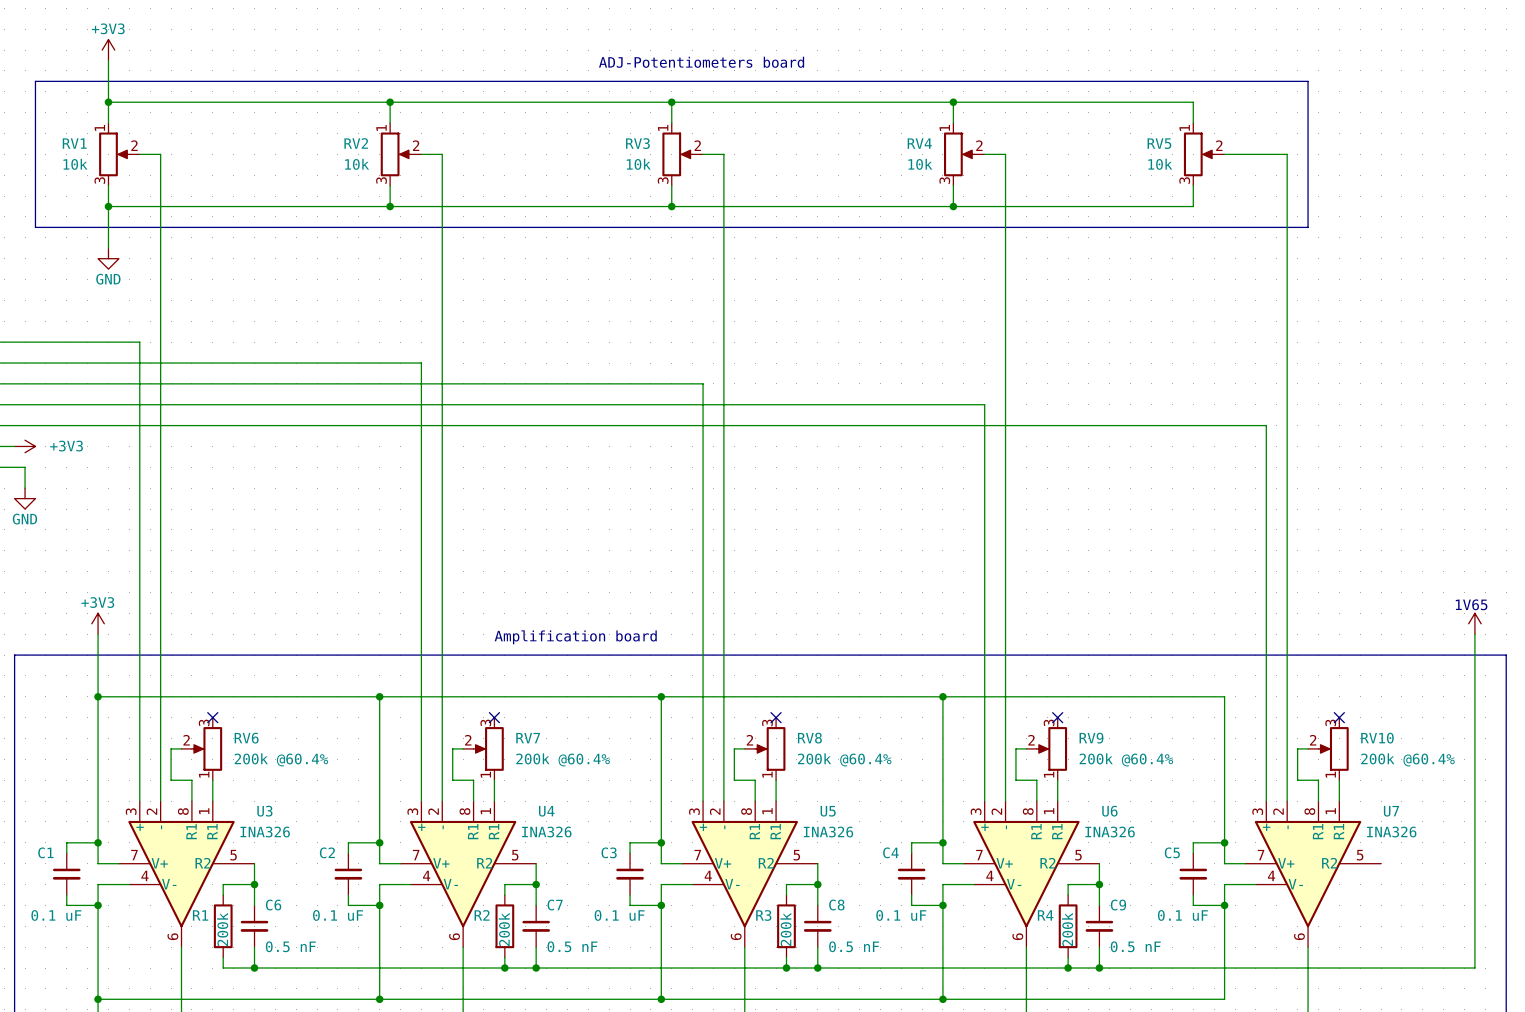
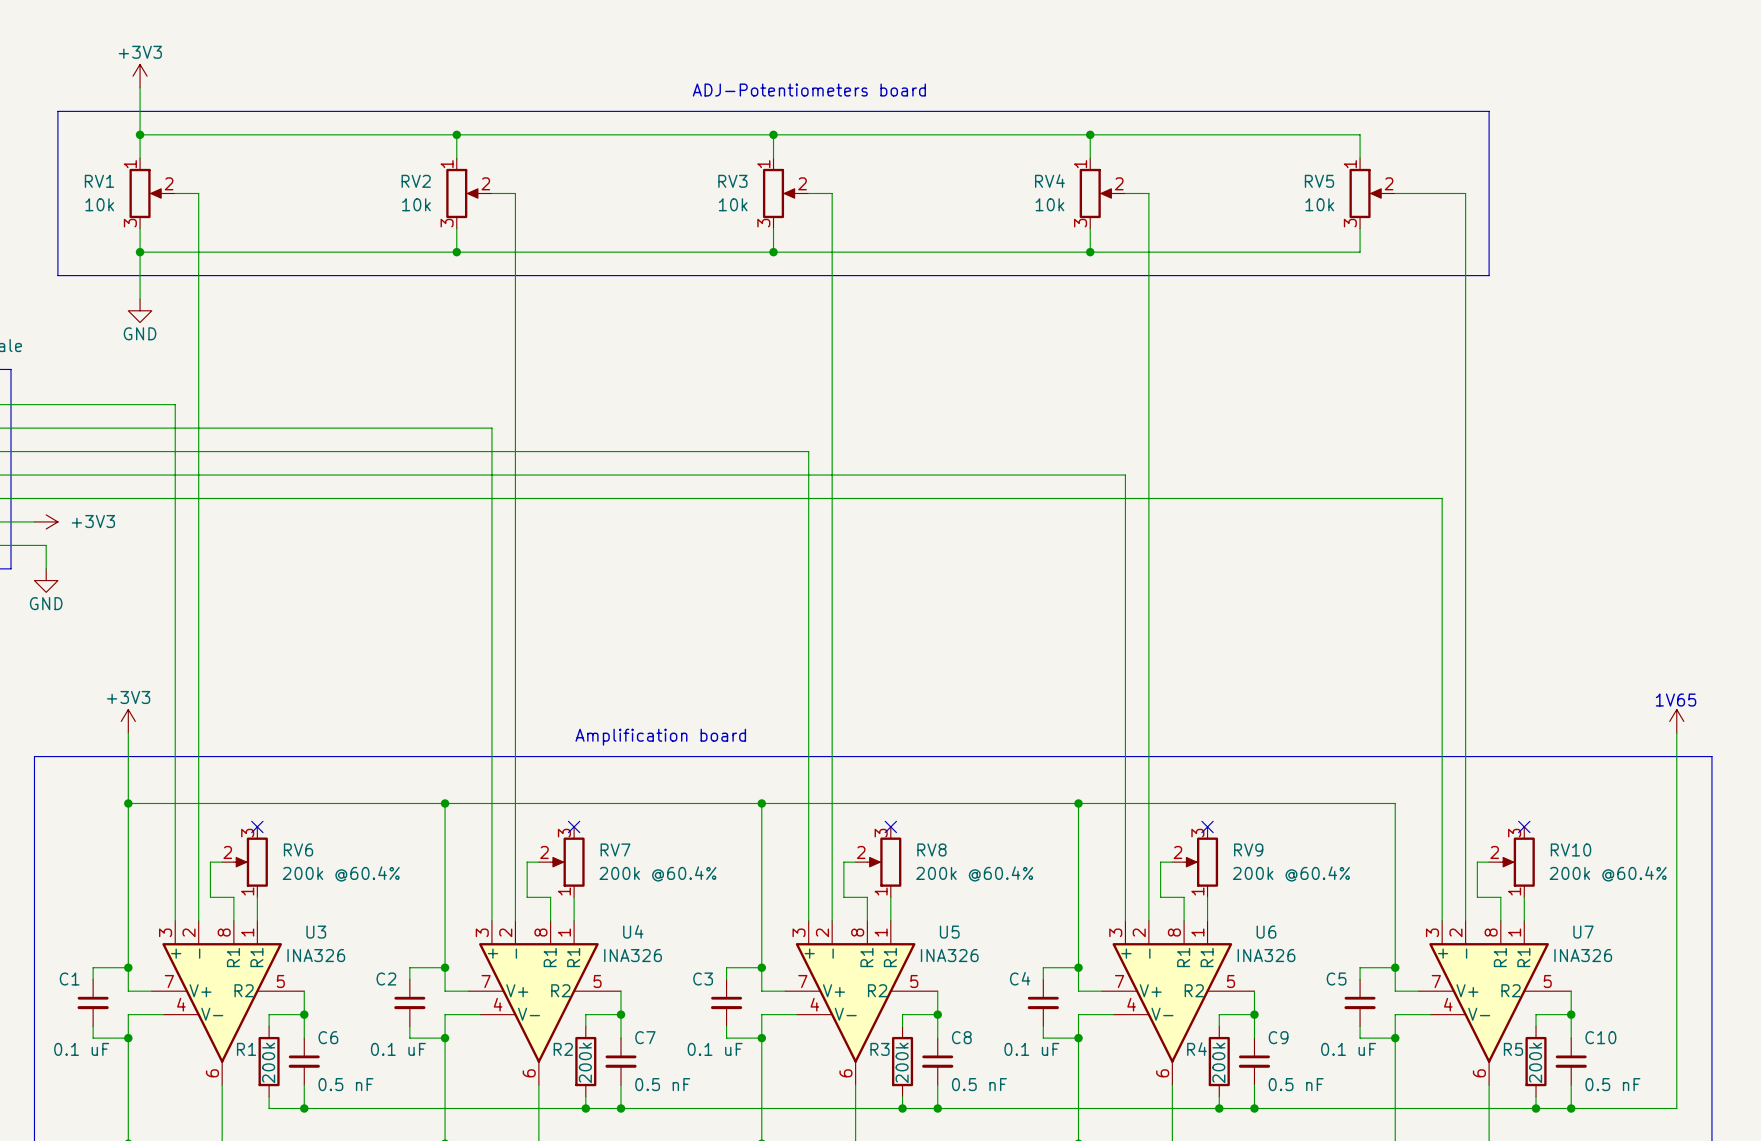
wire: none -> (1571, 991) (1571, 1038)
wire: none -> (1571, 1014) (1536, 1014) (1536, 1026)
junction: none -> (1571, 1014)
R5: none -> 200k (1536, 1061)
C10: none -> 0.5 nF (1571, 1061)
wire: none -> (1571, 1085) (1571, 1108)
wire: none -> (1536, 1096) (1536, 1108)
junction: none -> (1536, 1108)
junction: none -> (1571, 1108)

